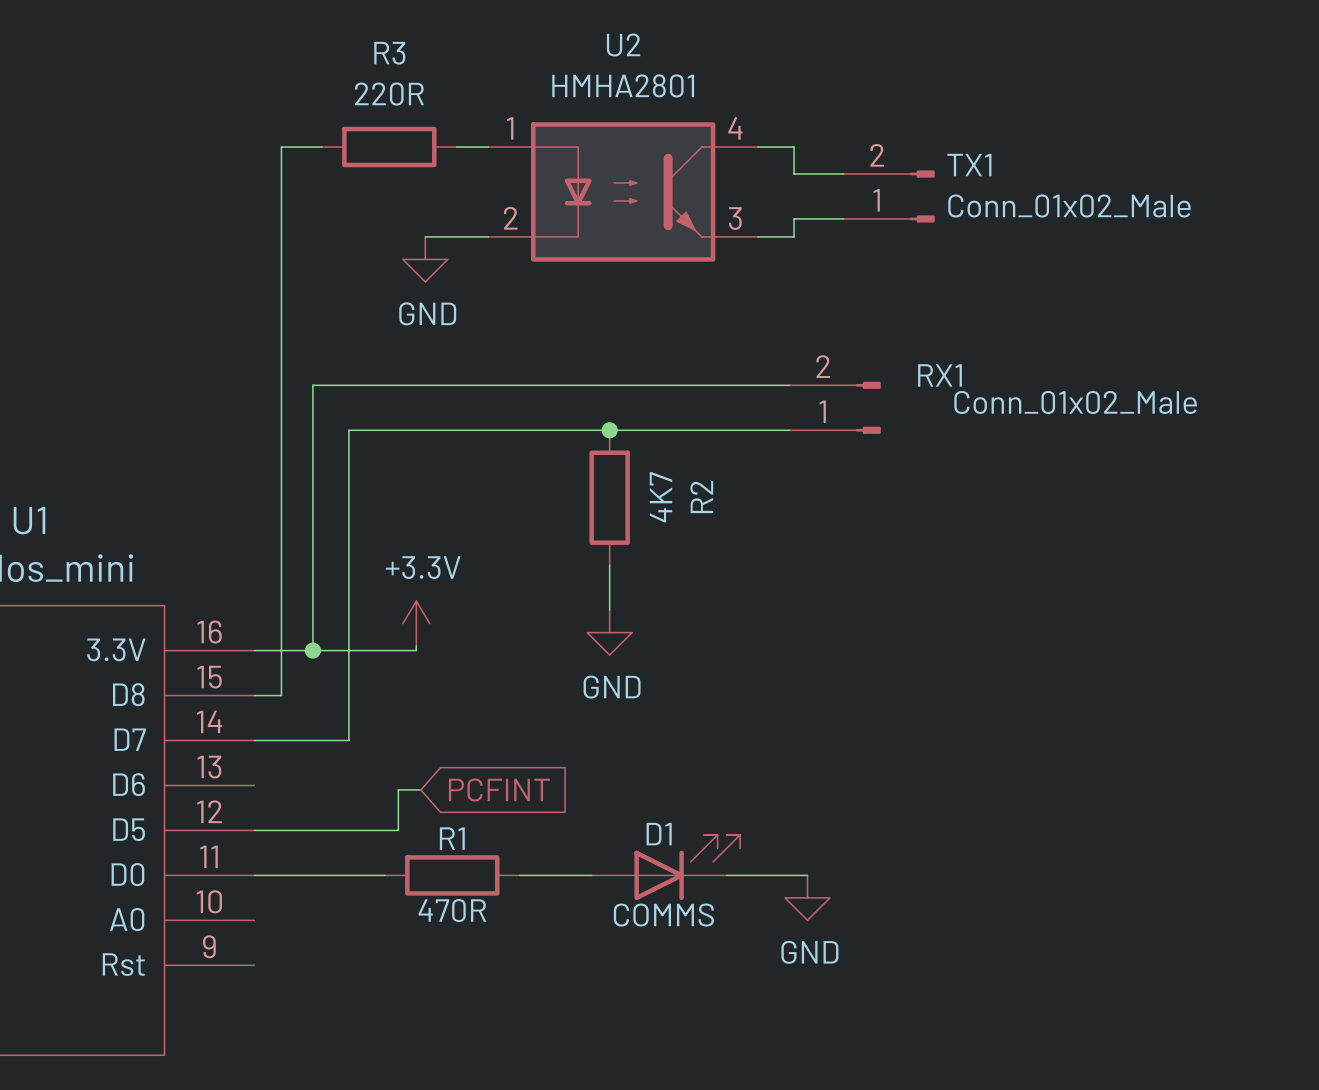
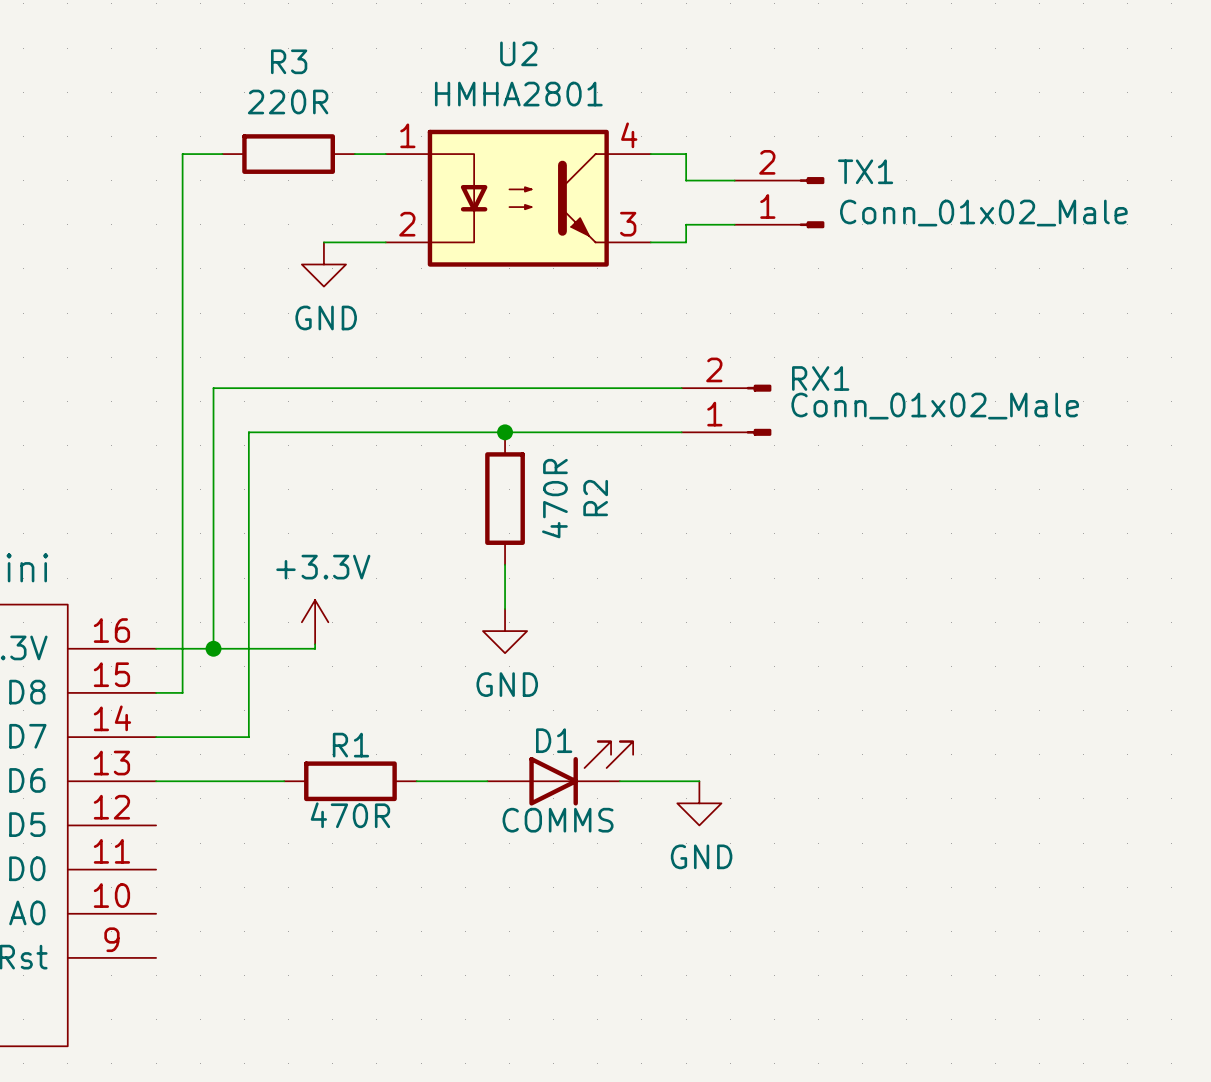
R2 value: 4K7 (660, 497) -> 470R (554, 498)
wire: (420, 789) (398, 789) (398, 830) (254, 830) -> none
global label: PCFINT (499, 789) -> none
D1 position: (665, 867) -> (560, 773)
wire: (254, 875) (384, 875) -> (156, 781) (284, 781)
R1 position: (452, 875) -> (350, 781)
wire: (519, 875) (591, 875) -> (416, 781) (487, 781)
wire: (726, 875) (807, 875) -> (619, 781) (699, 781)
power symbol position: GND (807, 897) -> GND (699, 803)

